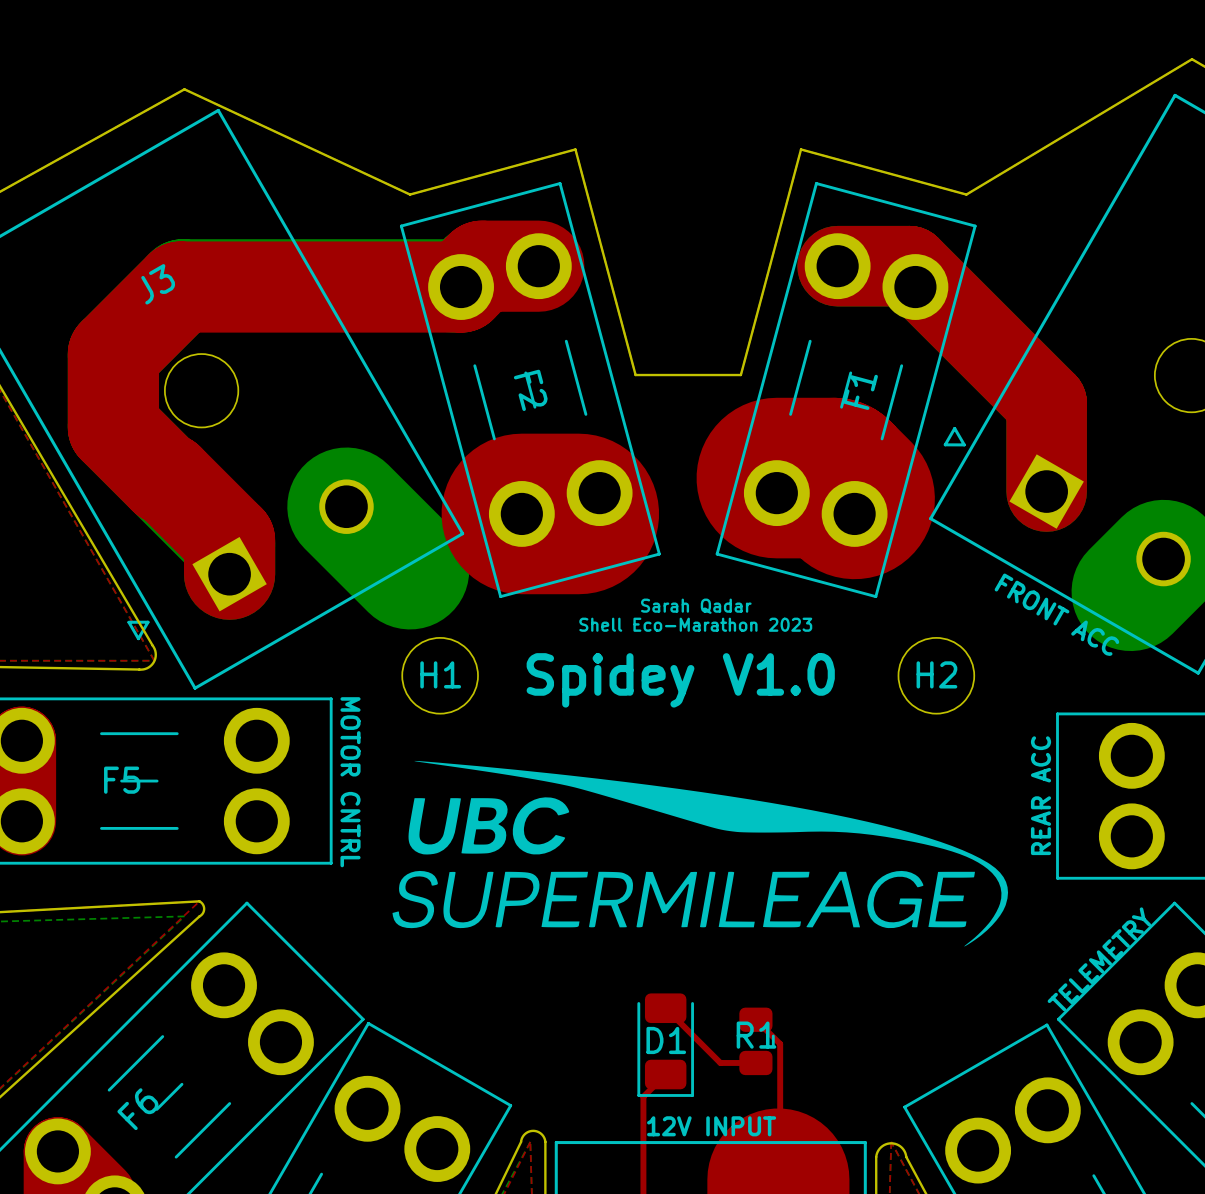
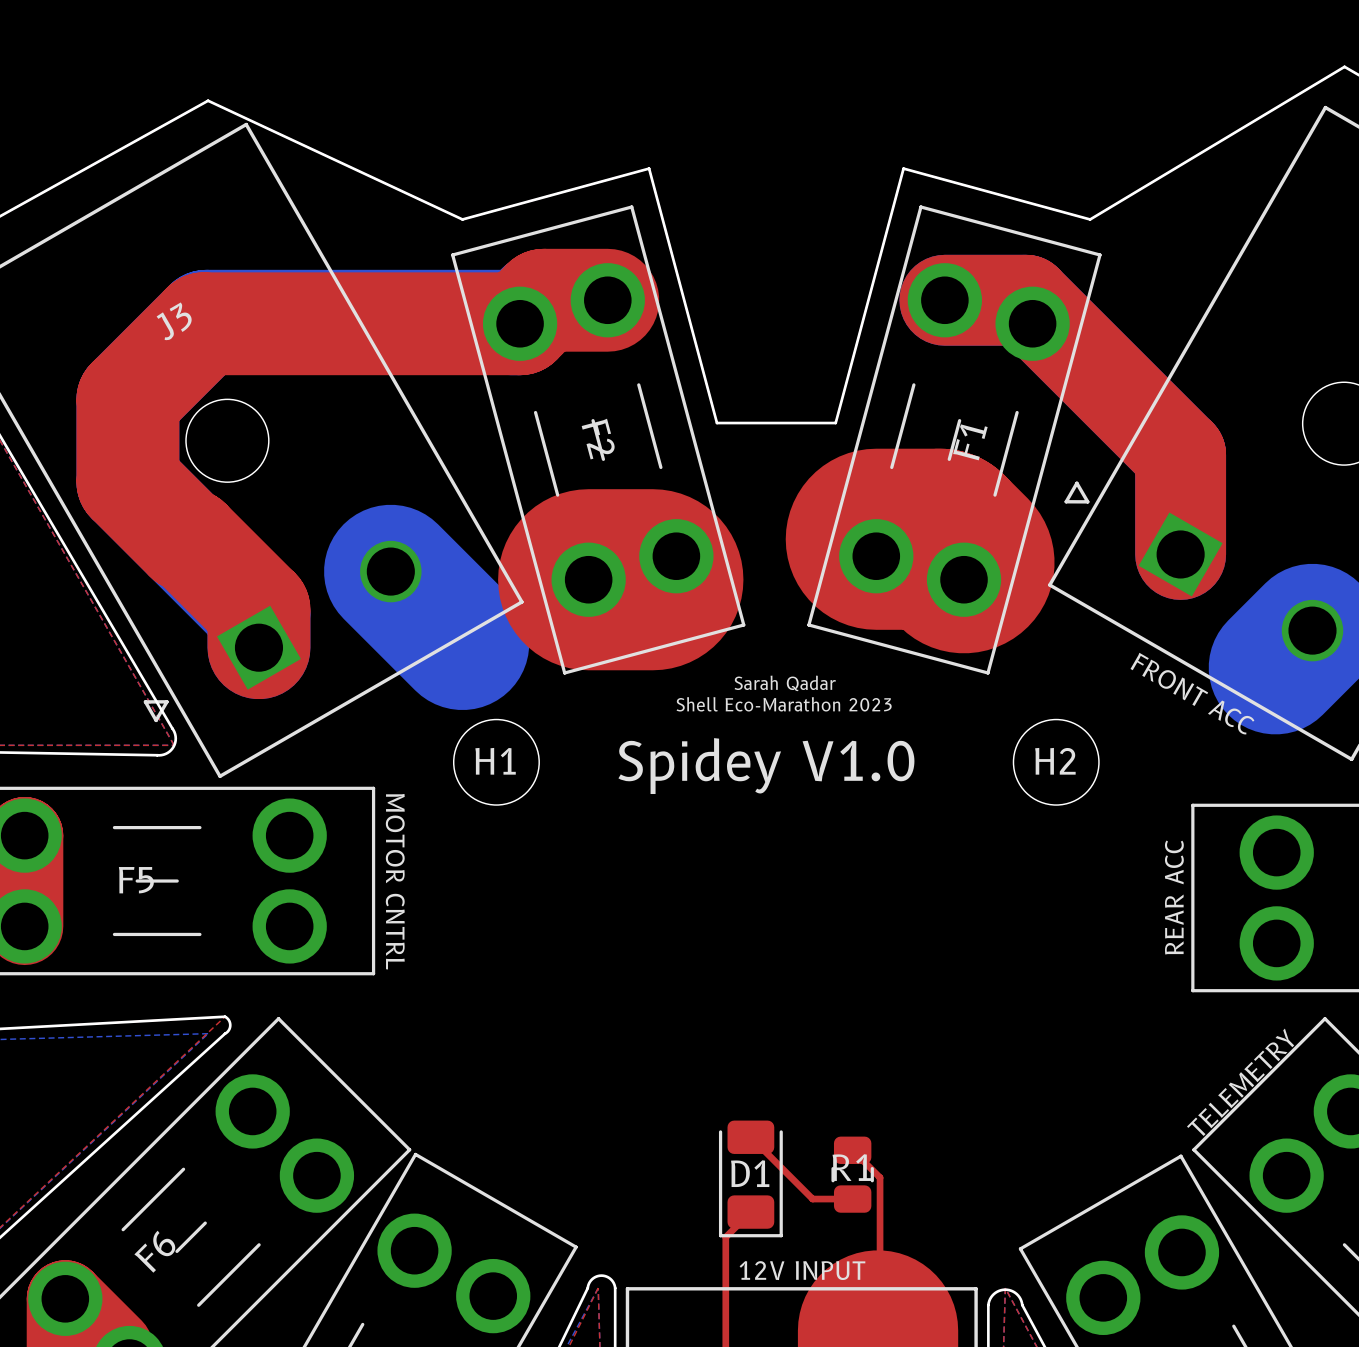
drawing: [392, 760, 1009, 947] -> none

